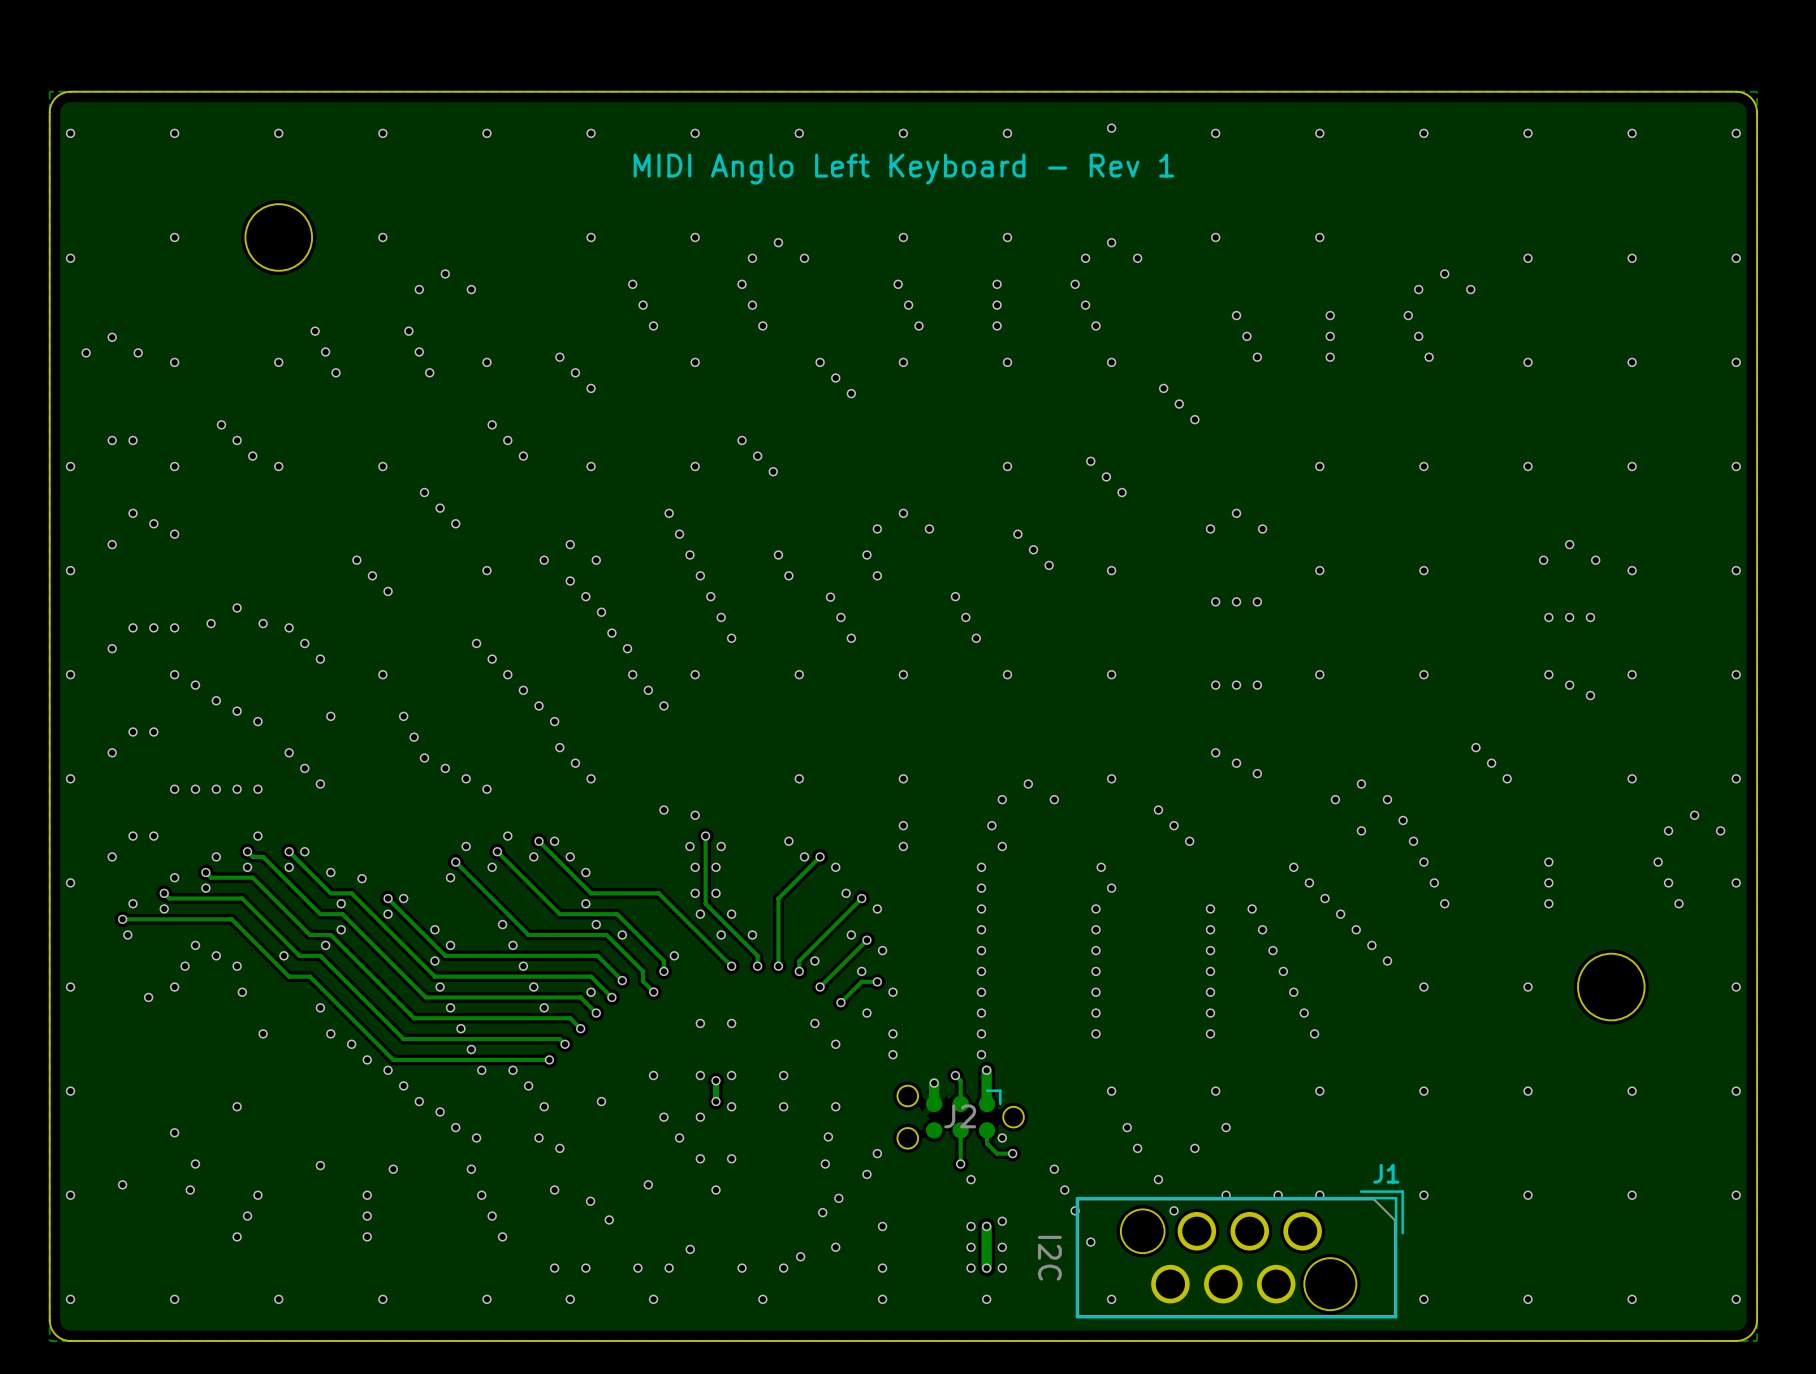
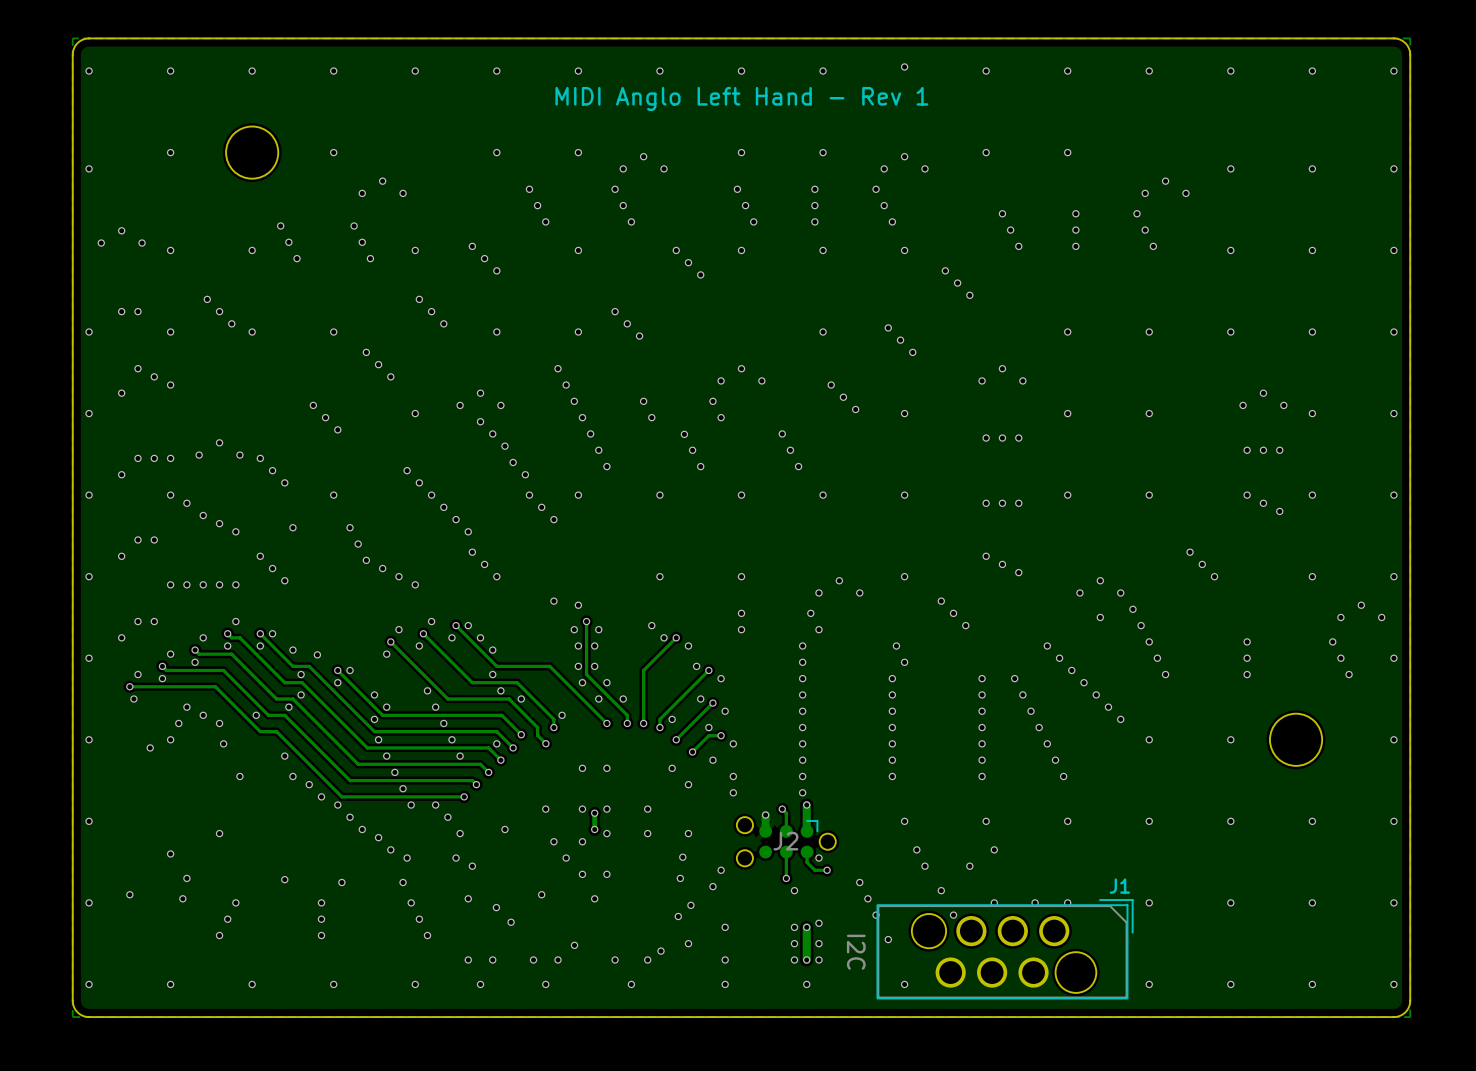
text: MIDI Anglo Left Keyboard - Rev 1 (903, 169) -> MIDI Anglo Left Hand - Rev 1 (741, 99)

